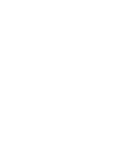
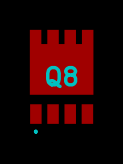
Q8: none -> (61, 81)

